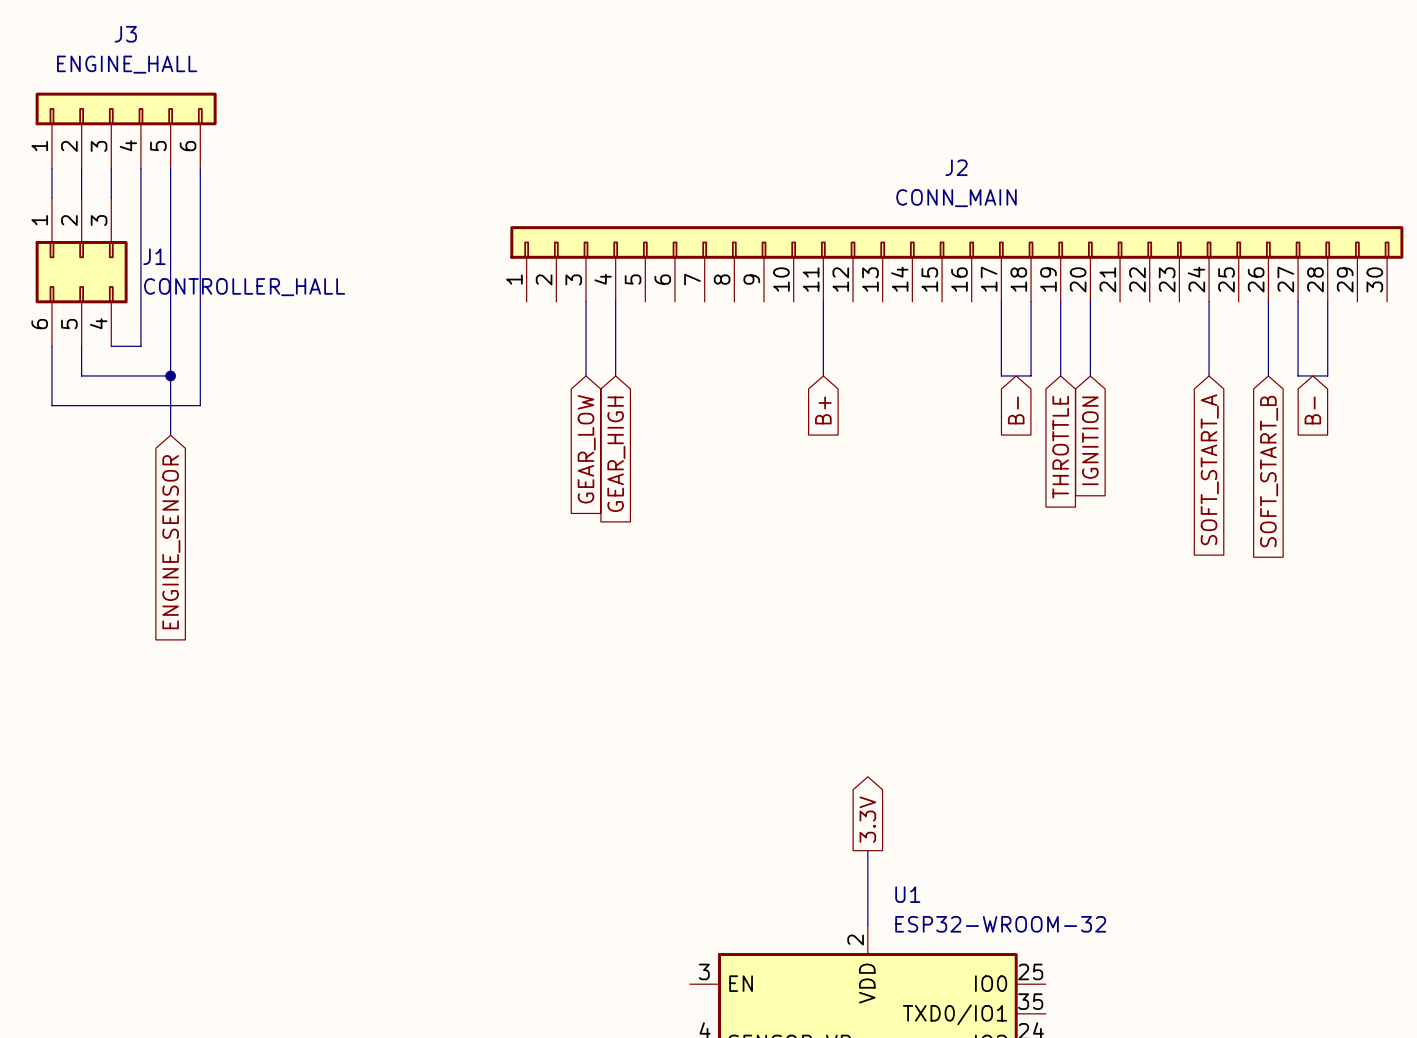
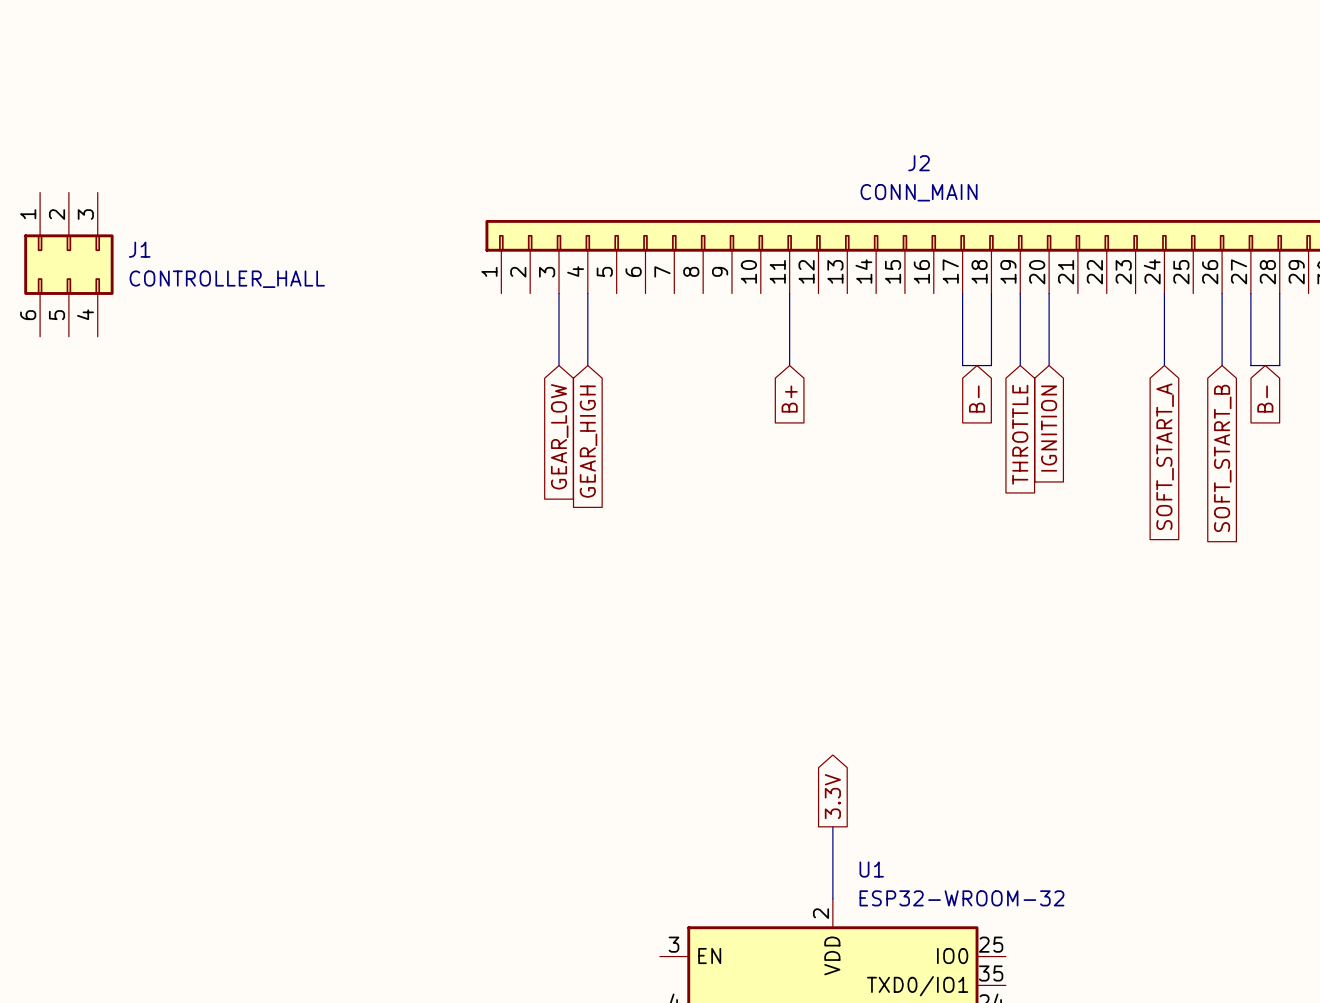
J3: ENGINE_HALL (126, 130) -> none
wire: (51, 168) (51, 197) -> none
wire: (81, 168) (81, 197) -> none
wire: (111, 168) (111, 197) -> none
wire: (140, 168) (140, 346) (111, 346) -> none
wire: (170, 168) (170, 435) -> none
wire: (200, 168) (200, 405) (51, 405) (51, 346) -> none
wire: (81, 346) (81, 375) (170, 375) -> none
junction: (170, 375) -> none
global label: ENGINE_SENSOR (171, 542) -> none

